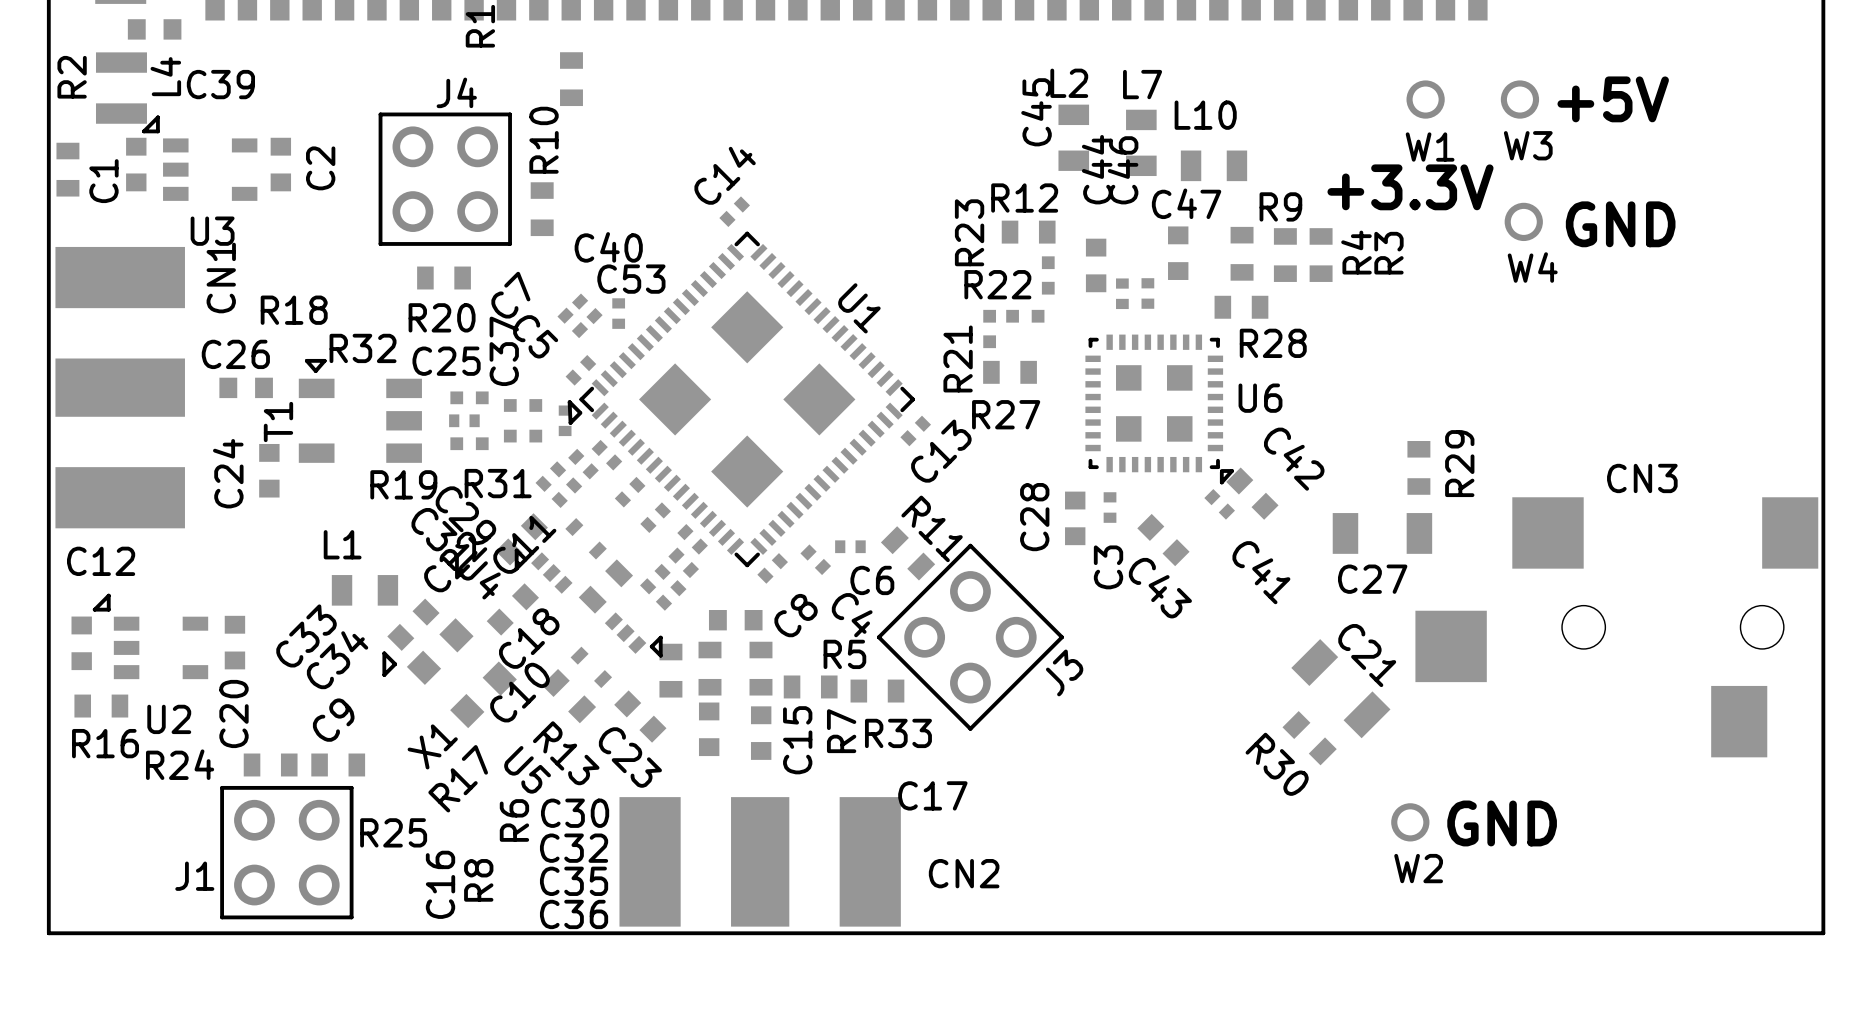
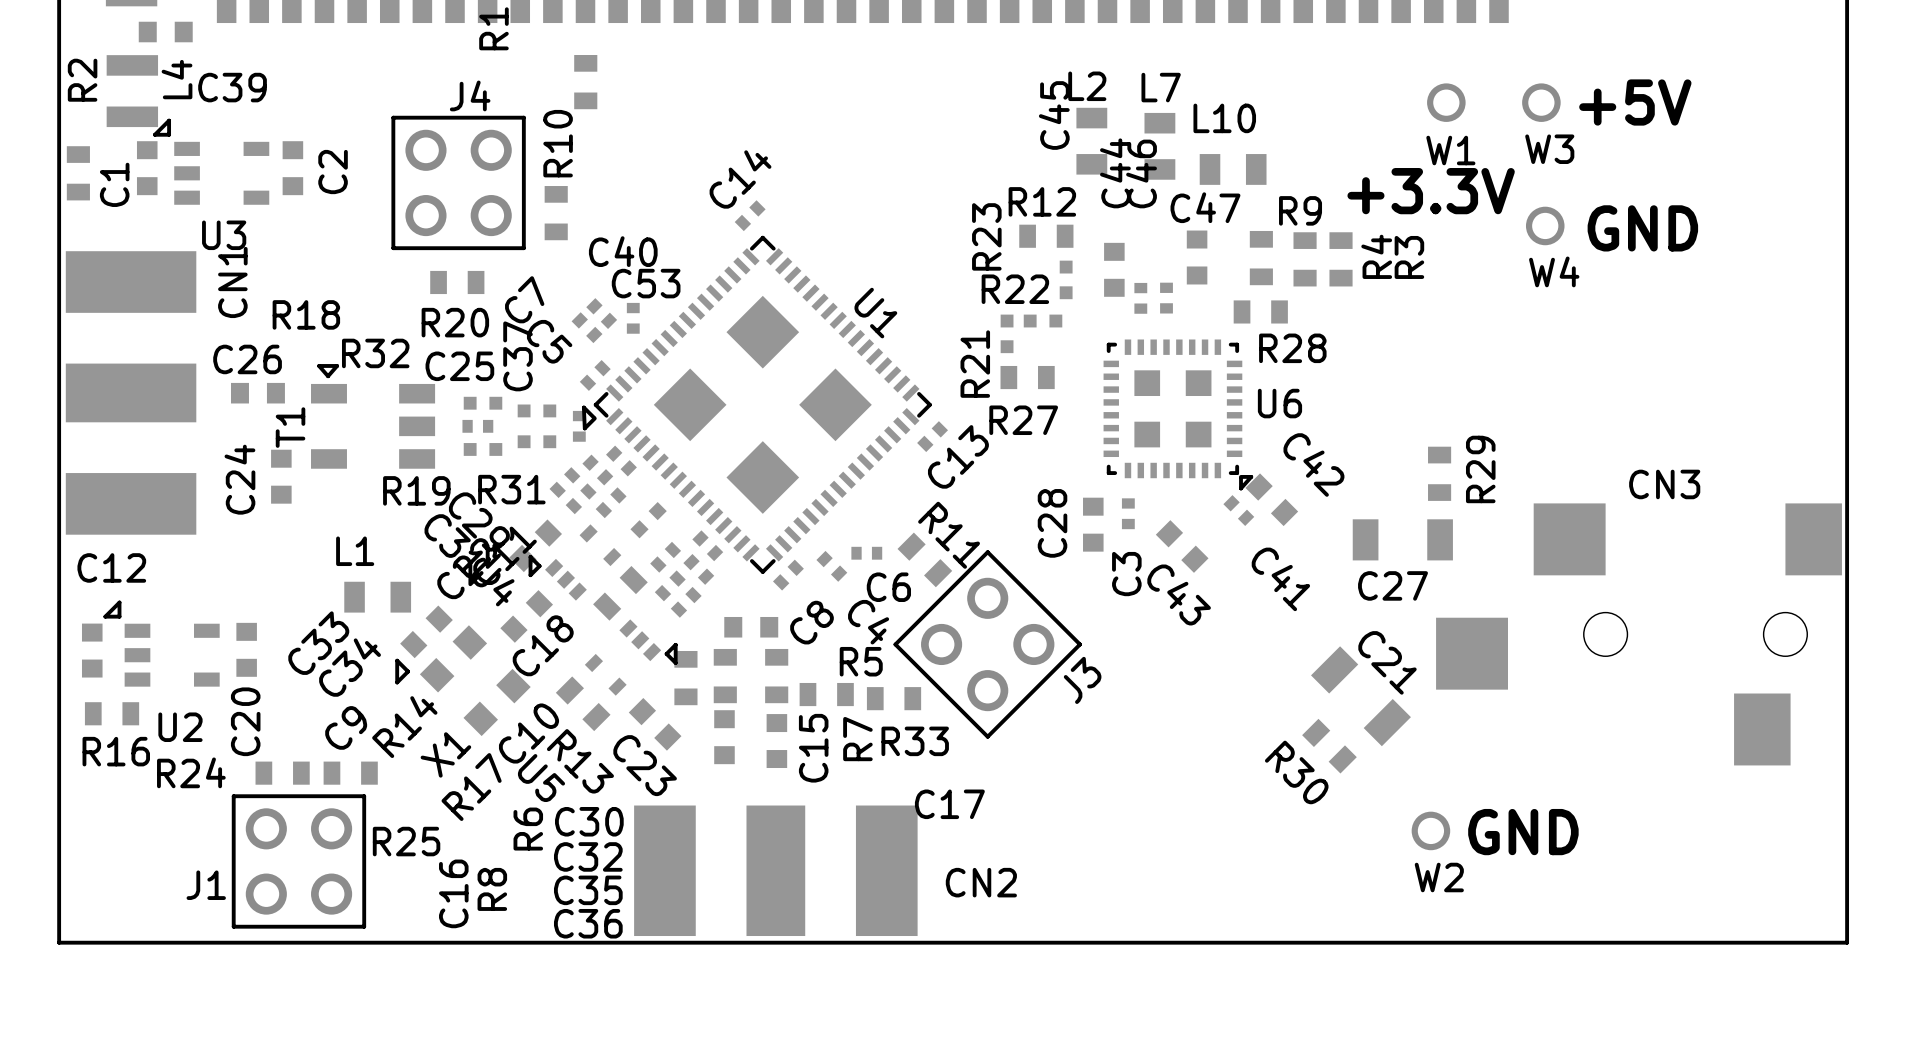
C11 position: (630, 492) -> (611, 502)
R14: none -> (648, 520)
C10 position: (655, 517) -> (665, 557)

